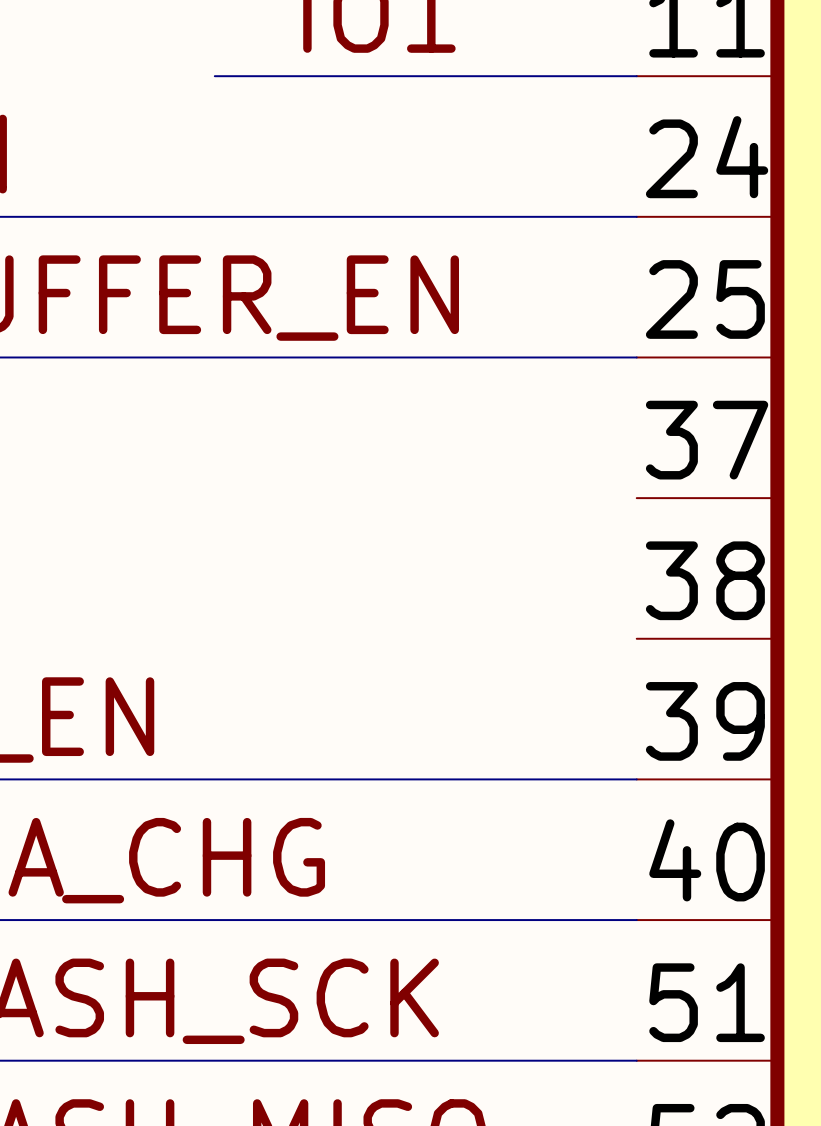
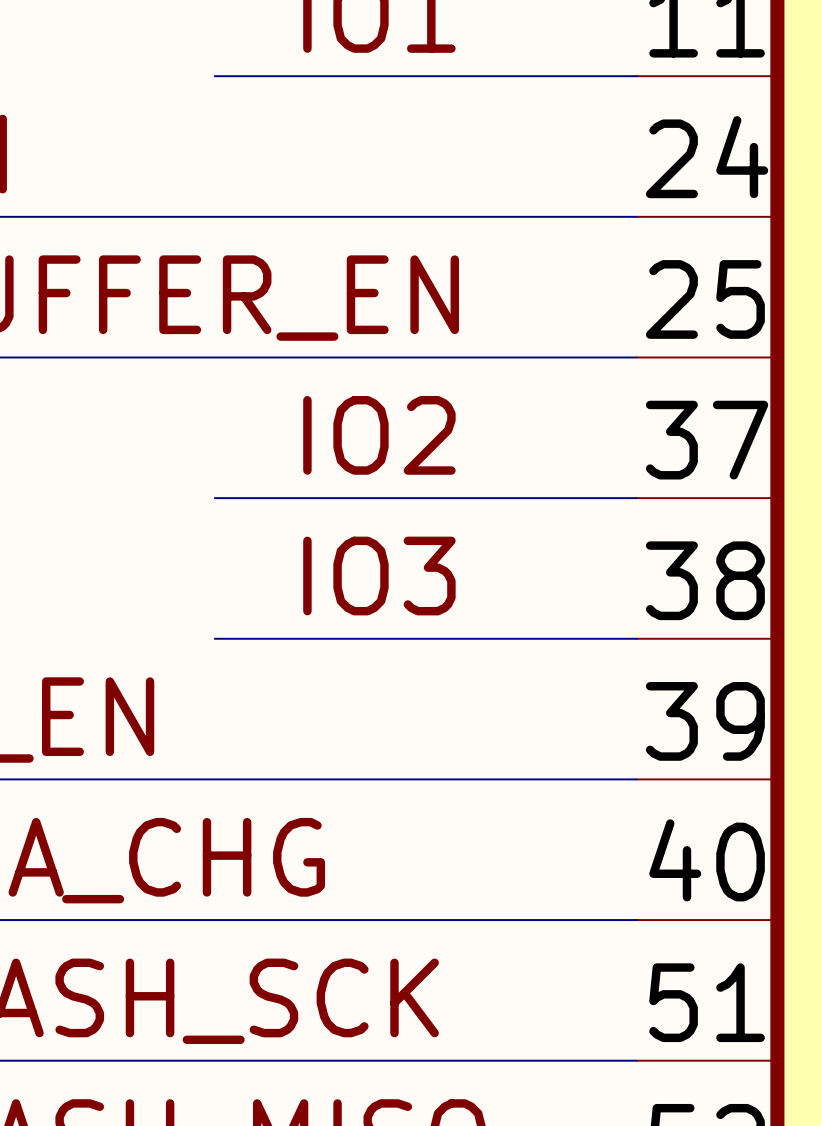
label: none -> IO2 (379, 435)
wire: none -> (214, 498) (636, 498)
label: none -> IO3 (379, 576)
wire: none -> (214, 638) (636, 638)

